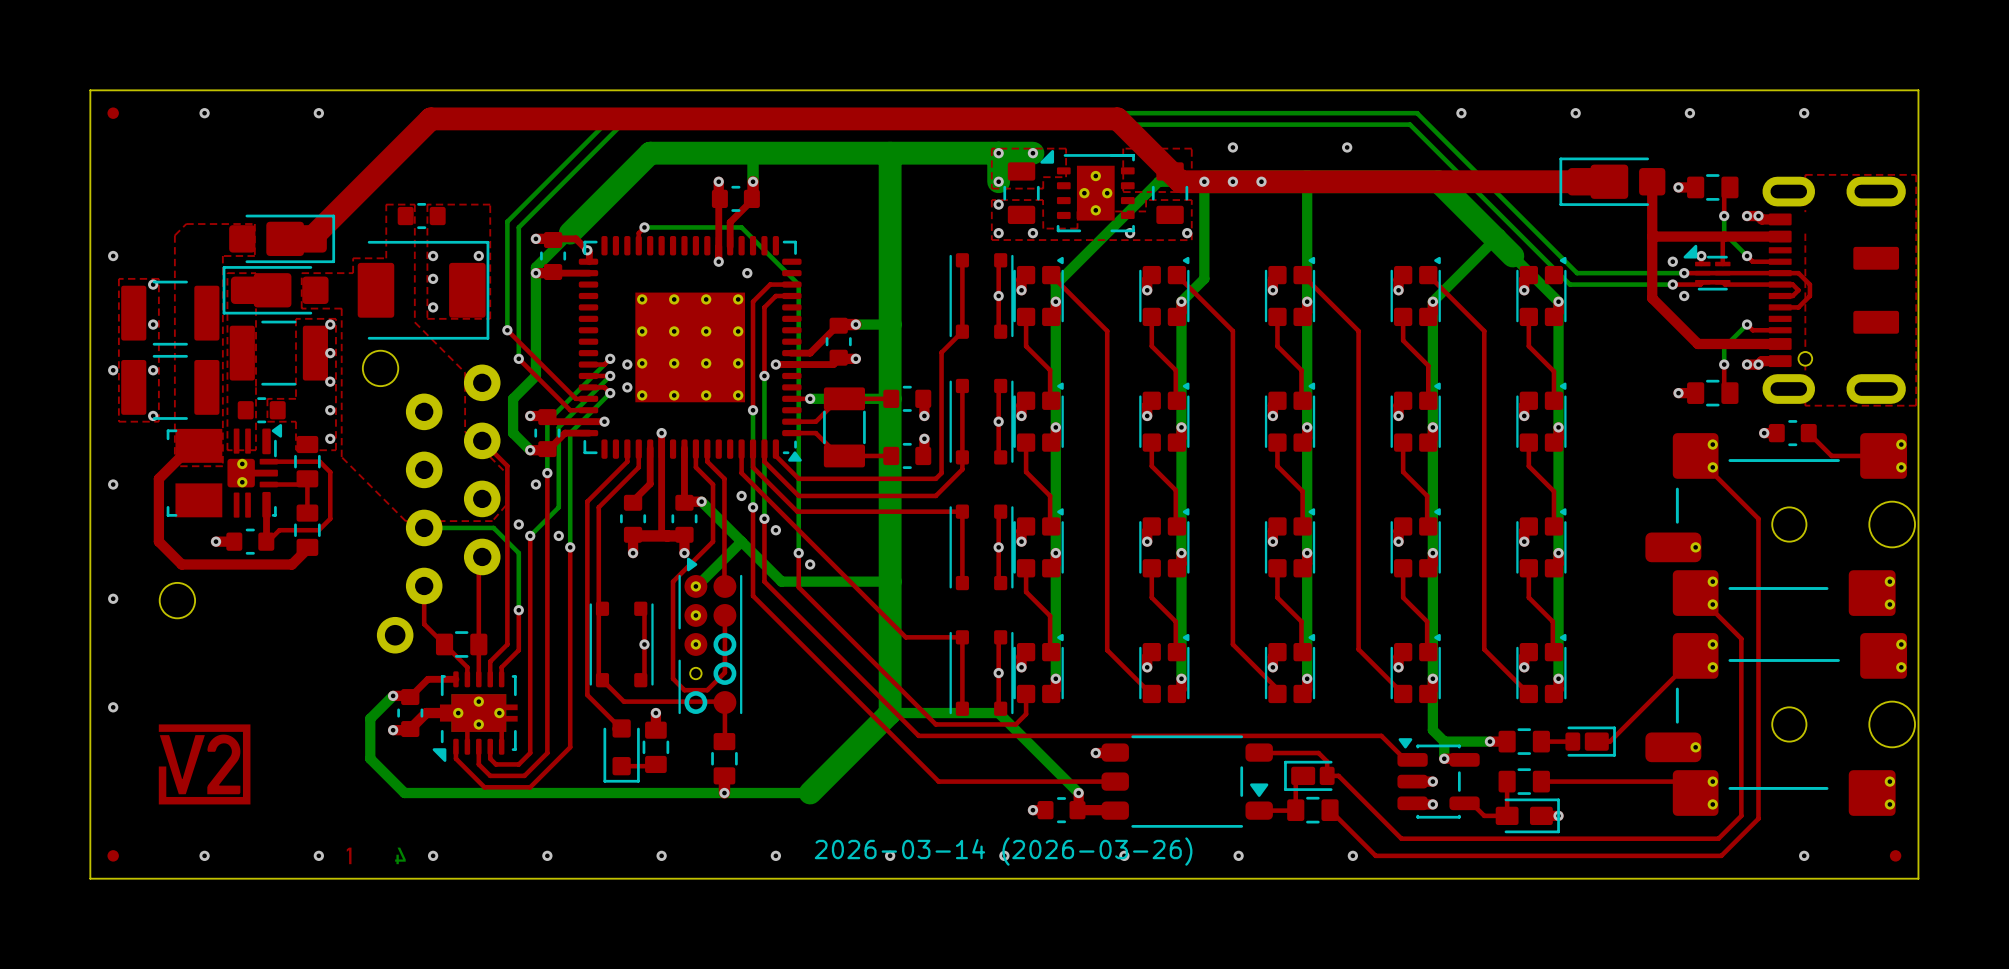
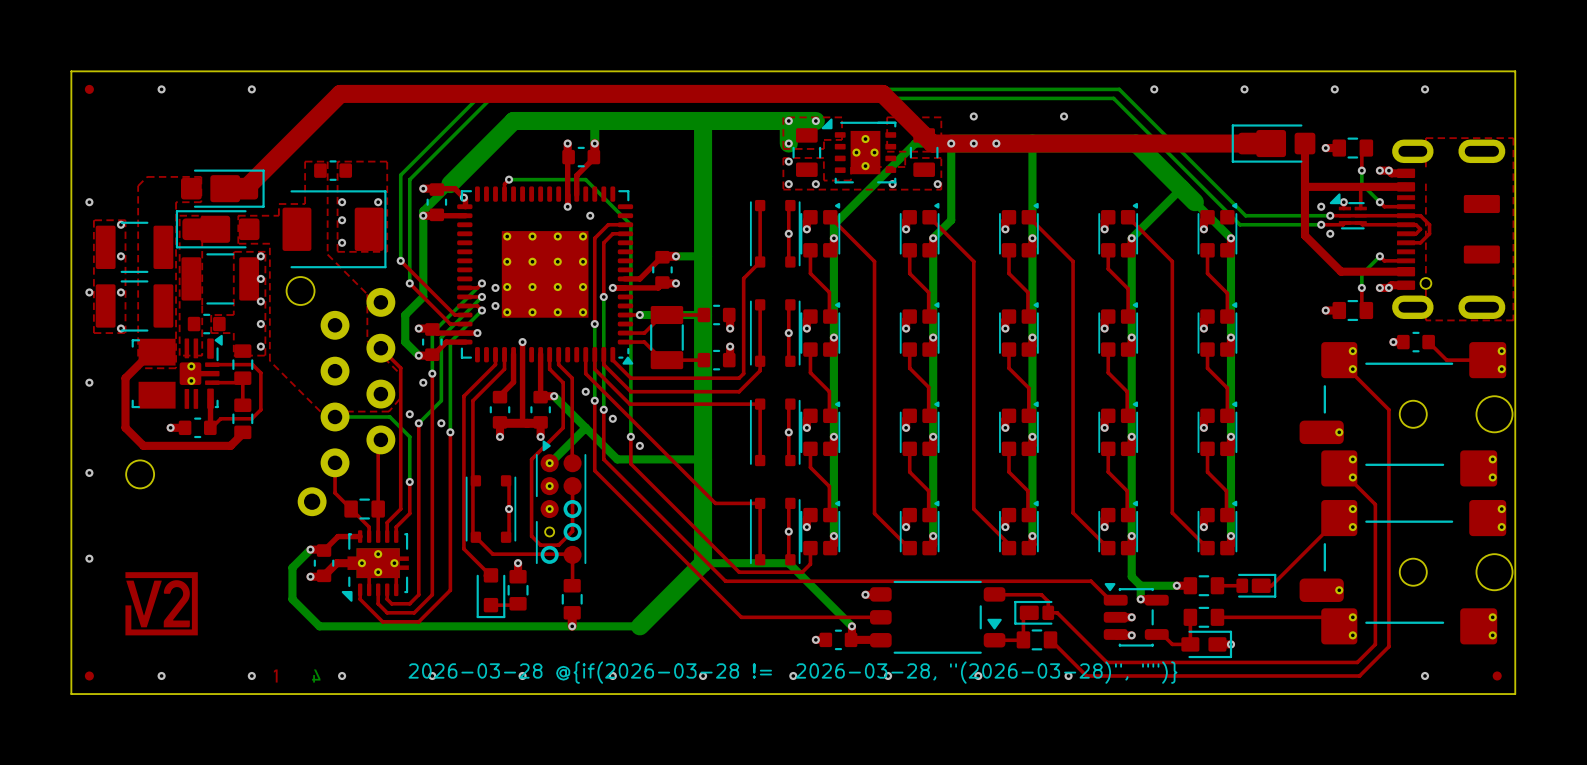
drawing shape: [814, 837, 1193, 866] -> [408, 661, 1178, 684]

